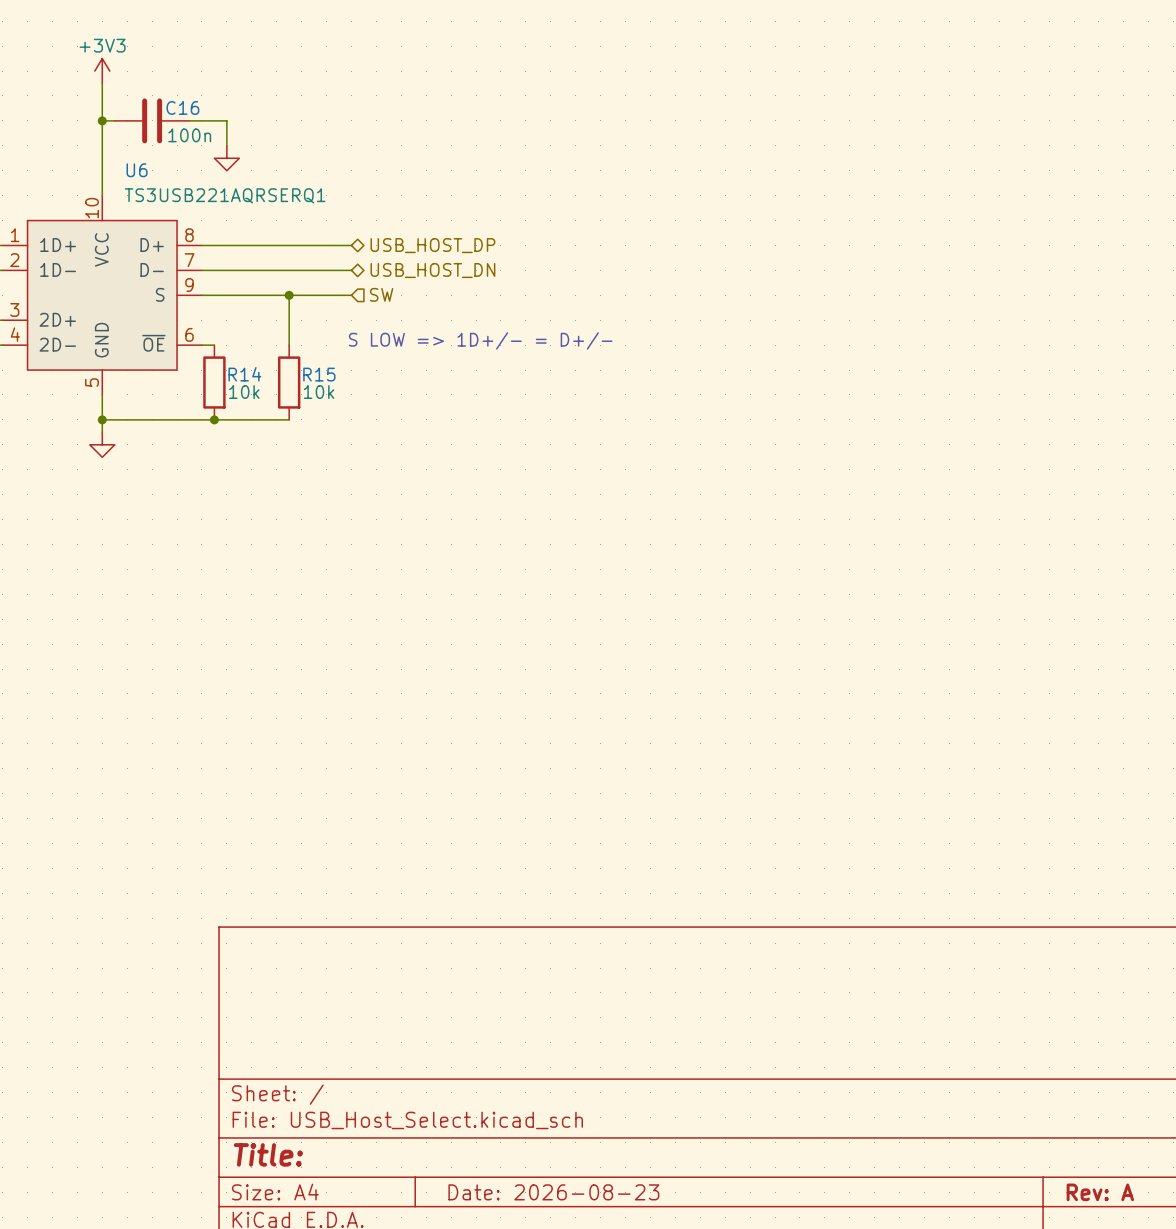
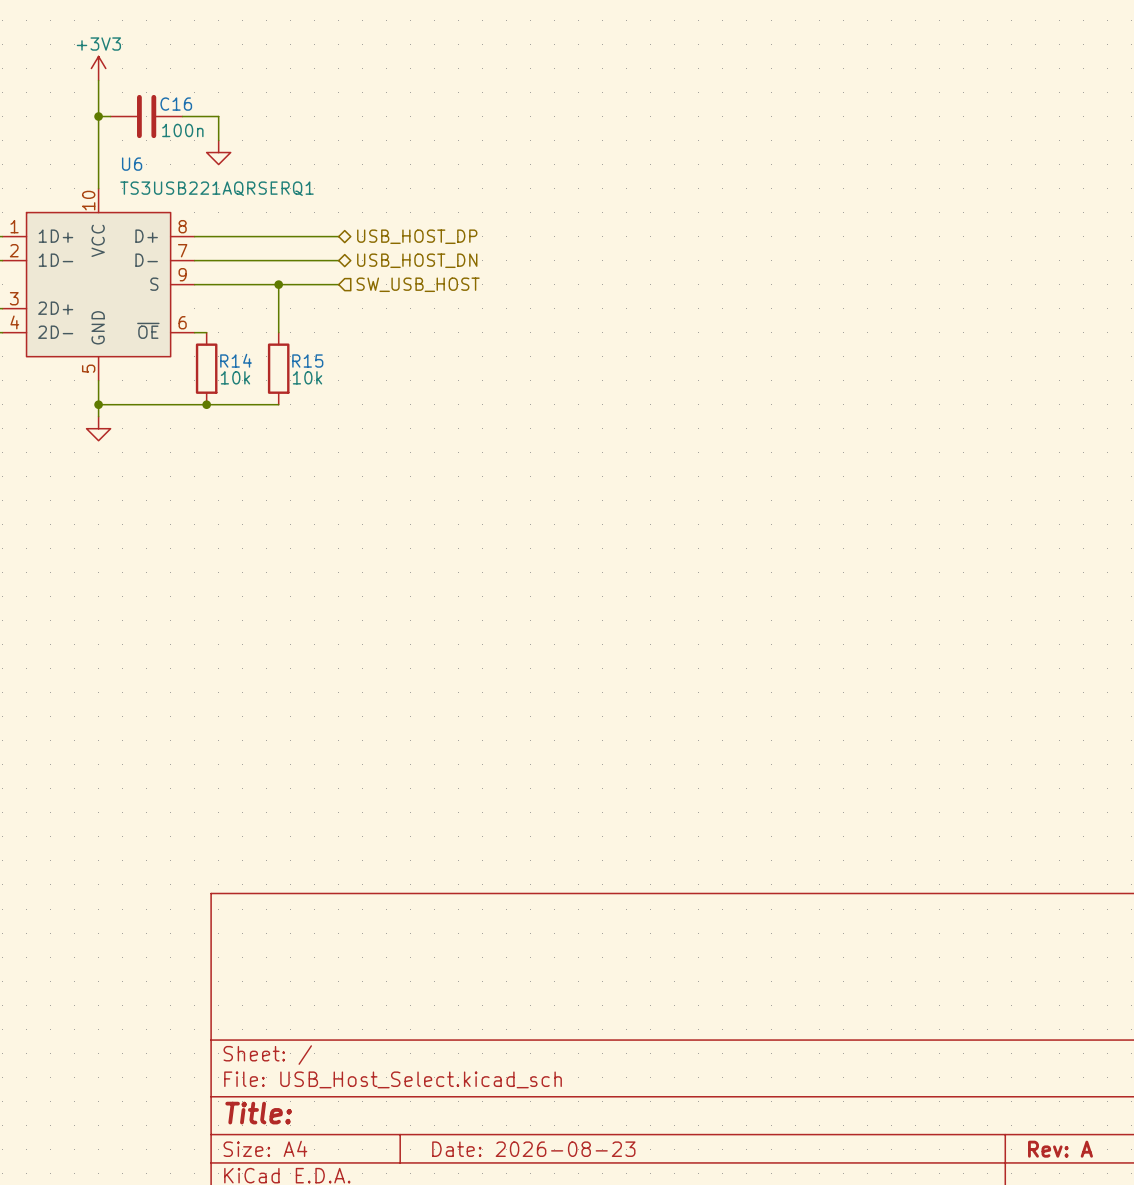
hierarchical label: SW (381, 294) -> SW_USB_HOST (418, 284)
text: S LOW => 1D+/- = D+/- (480, 340) -> none

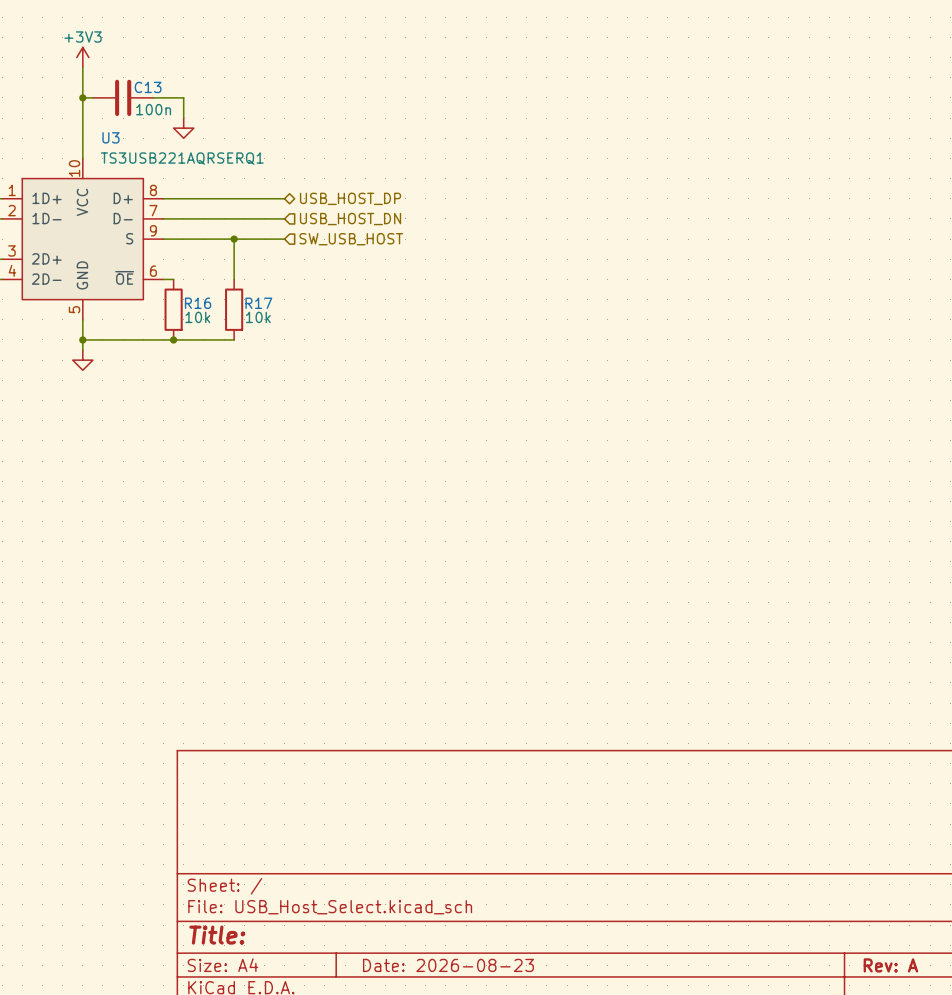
C16 name: C16 (176, 104) -> C13 (148, 87)
U6 name: U6 (132, 164) -> U3 (110, 137)
hierarchical label shape: bidirectional (417, 260) -> input (350, 219)
R14 name: R14 (236, 360) -> R16 (198, 303)
R15 name: R15 (307, 361) -> R17 (258, 303)

